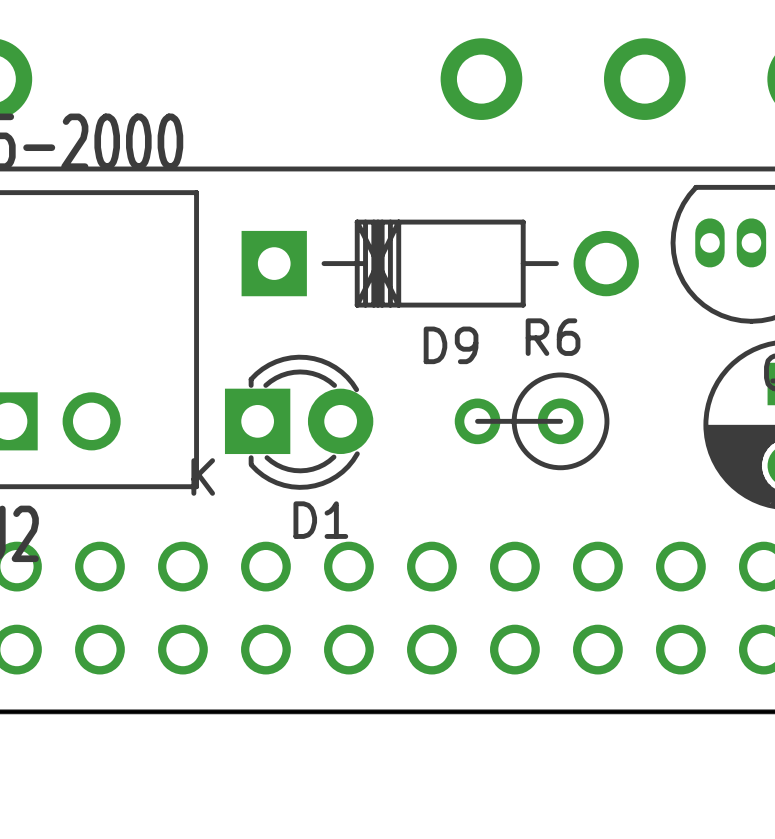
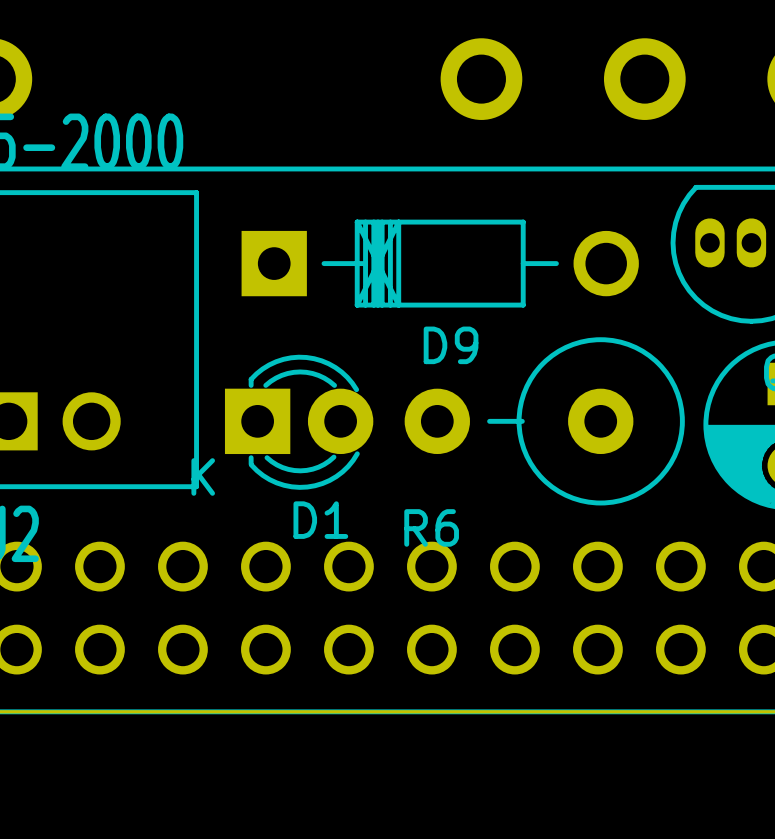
R6 name position: R6 (553, 337) -> R6 (431, 527)
R6 footprint: [454, 372, 610, 471] -> [404, 337, 685, 506]

